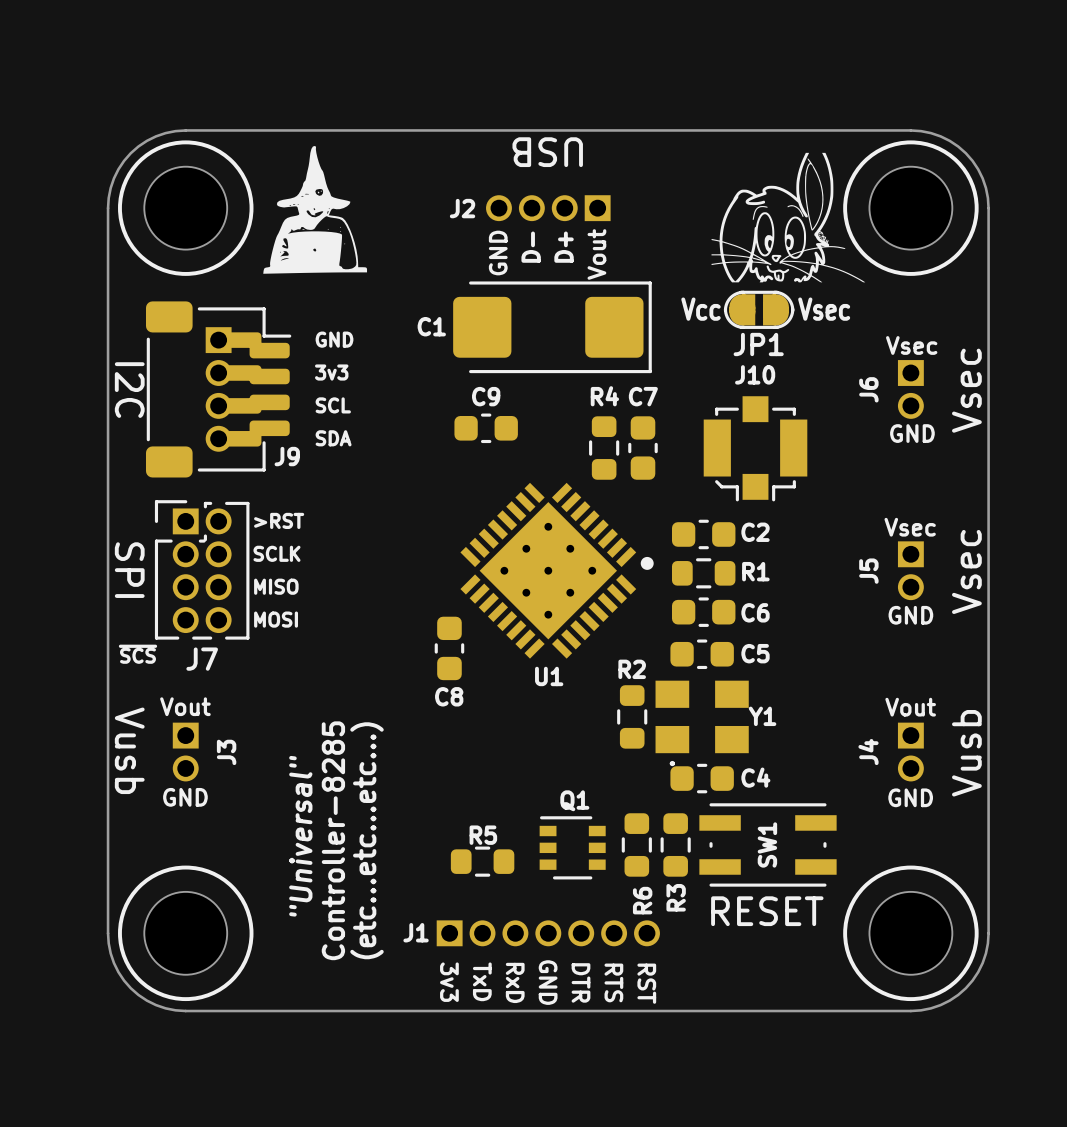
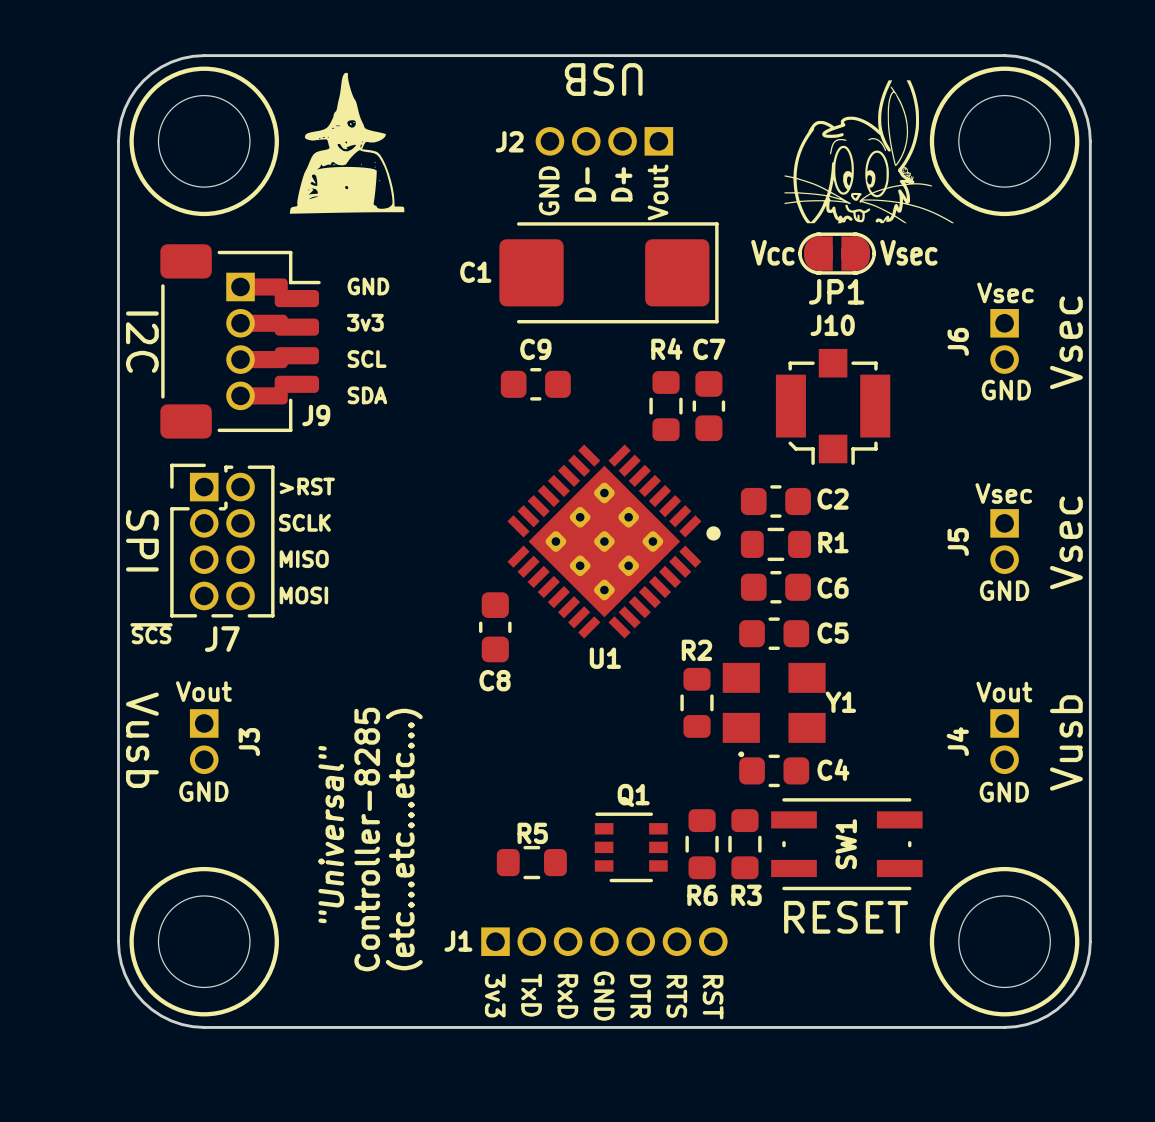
R3 name rotation: 0° (676, 897) -> 90° clockwise (746, 895)
R6 name rotation: 0° (642, 900) -> 90° clockwise (702, 895)

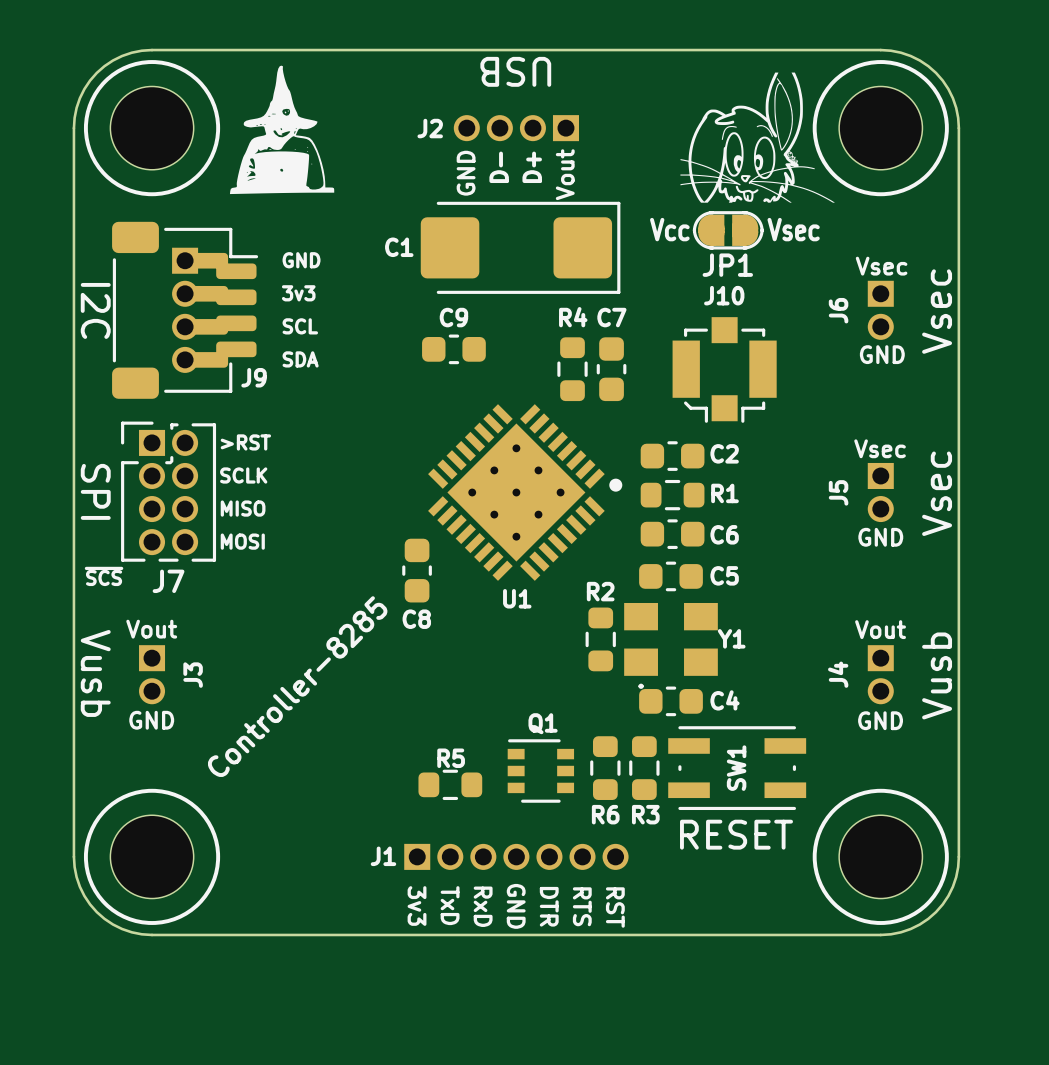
text: "Universal" (331, 834) -> none
text rotation: 0° (367, 839) -> 45° clockwise (297, 686)
text: (etc...etc...etc...) (404, 839) -> none

